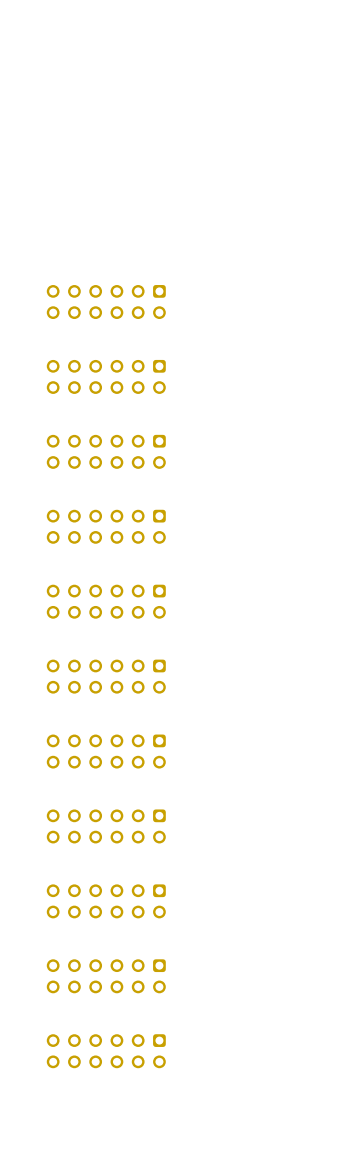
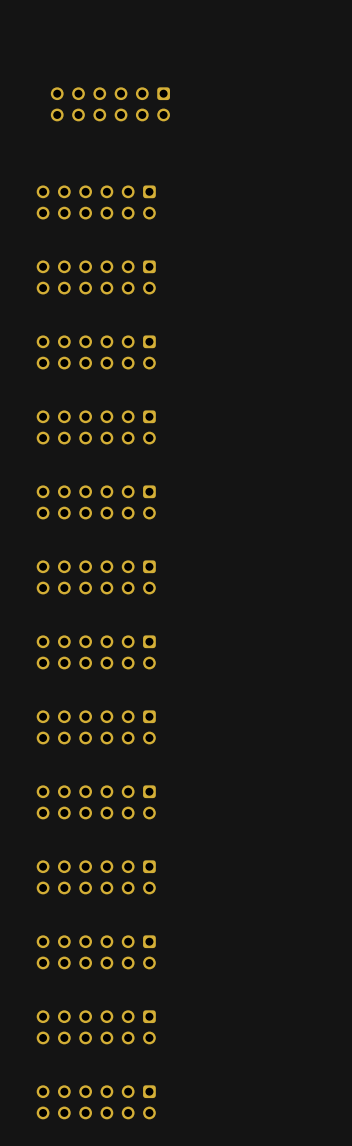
part: none -> (110, 104)
part: none -> (96, 202)
part: none -> (96, 1102)

